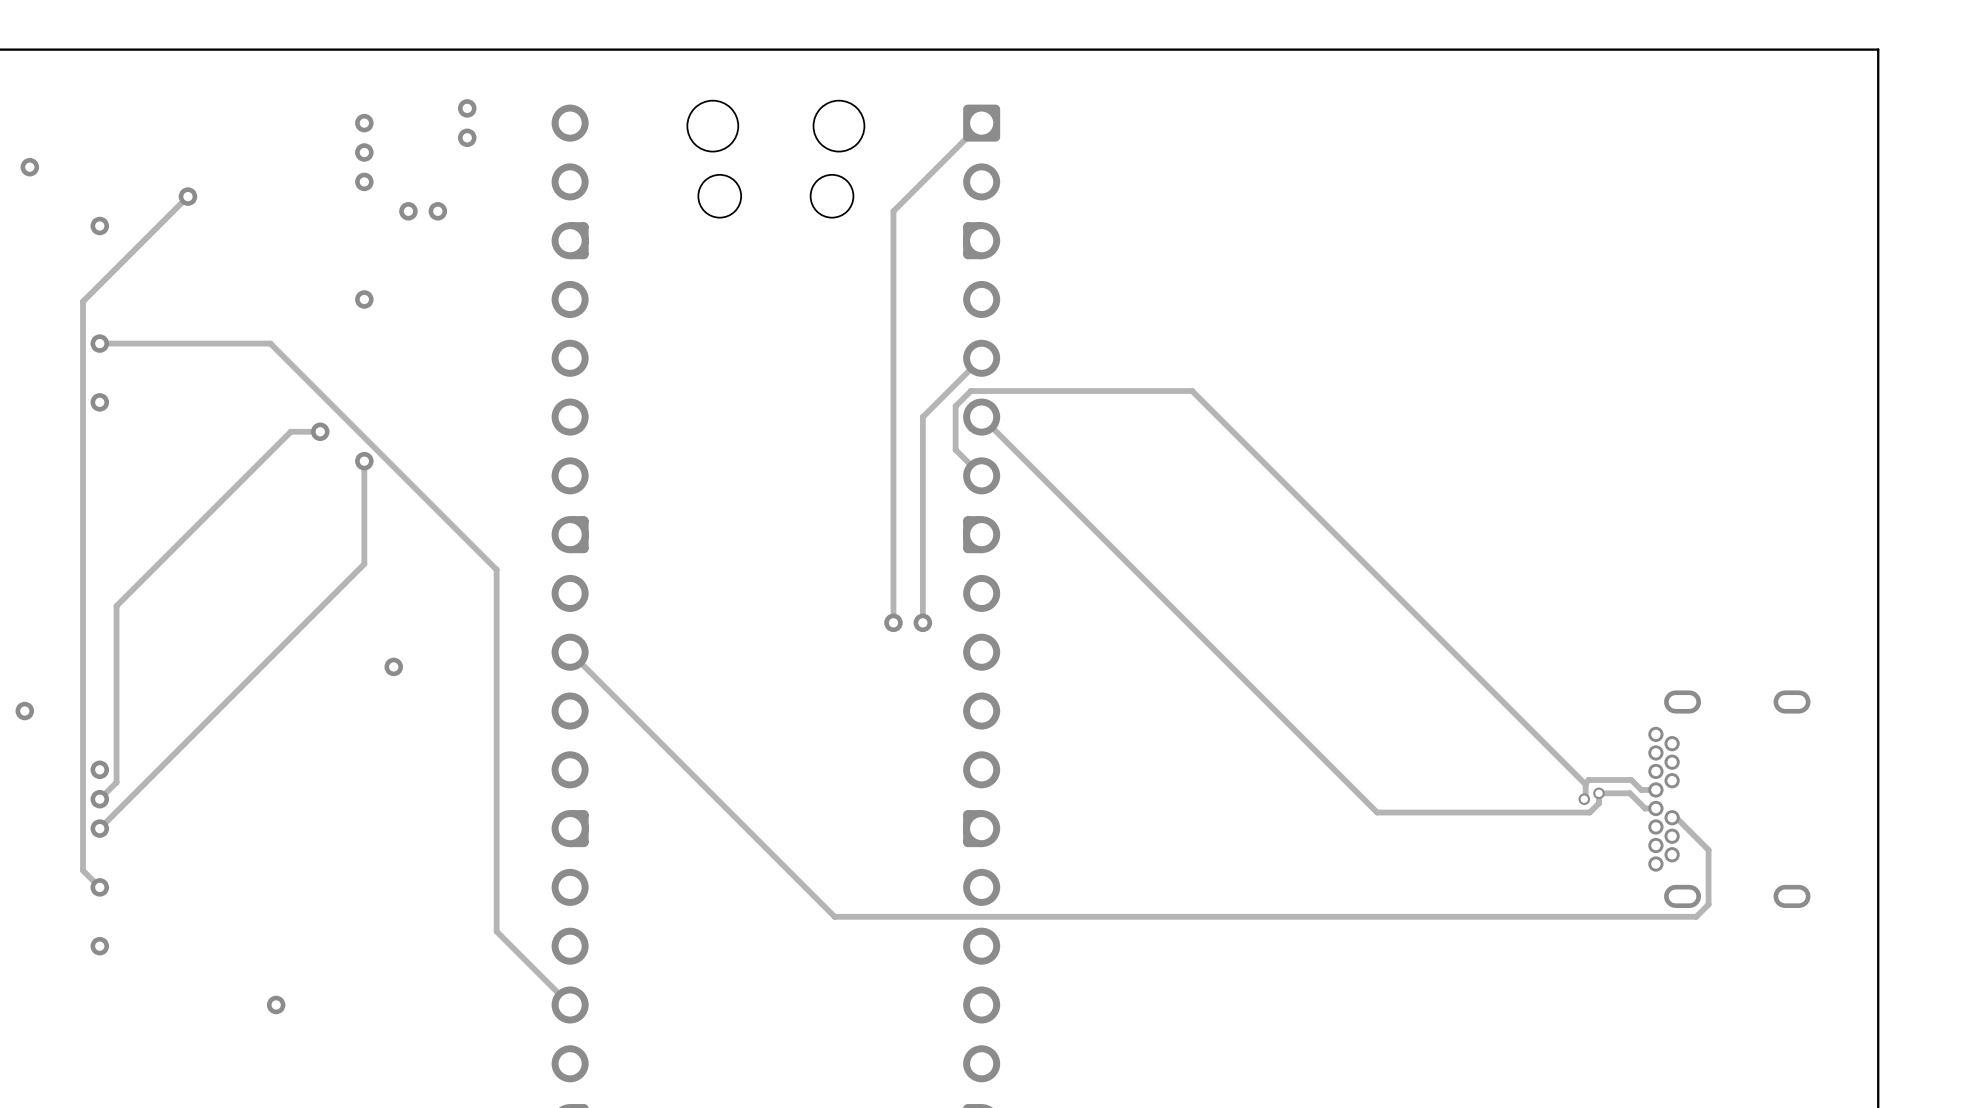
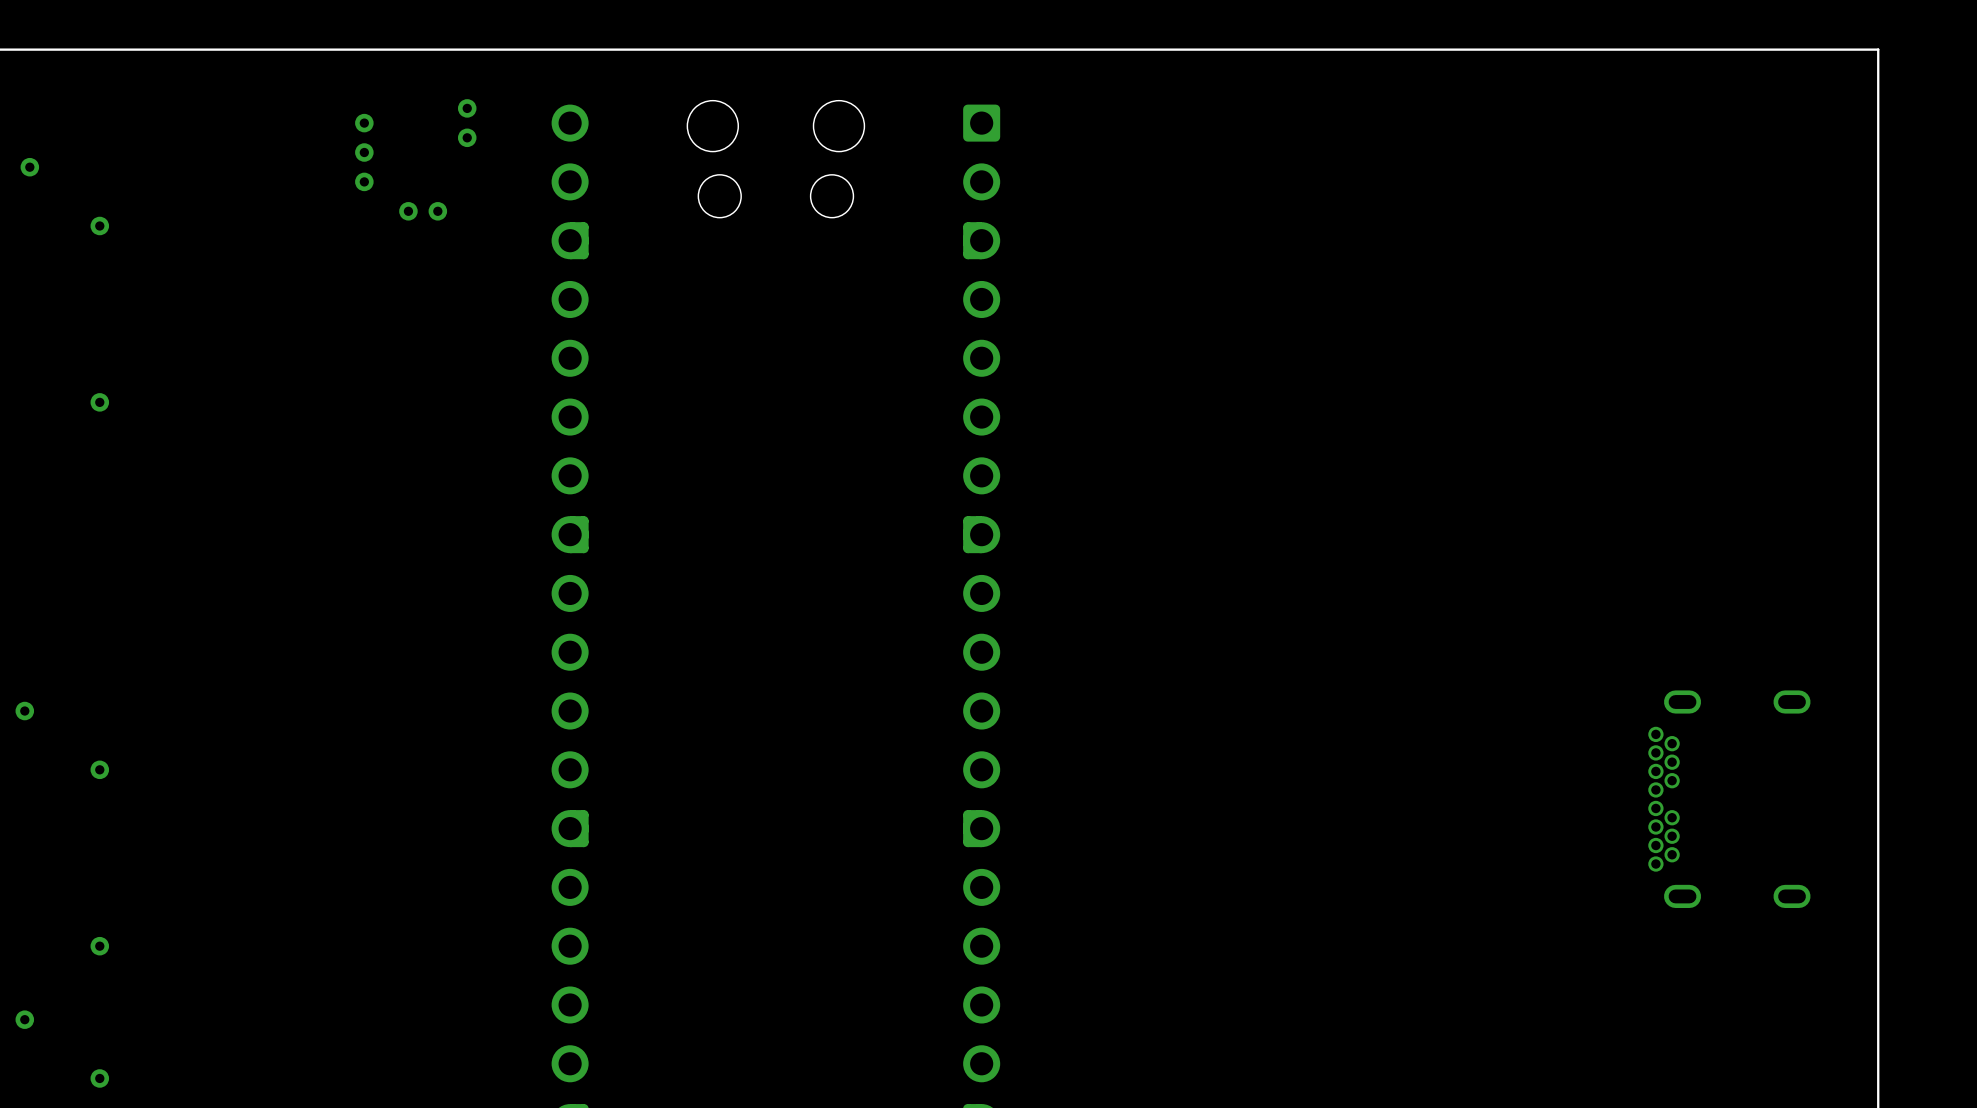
track: (981, 123) (893, 211) (893, 622) -> none
track: (187, 196) (83, 301) (83, 870) (99, 887) -> none
via: (187, 196) -> none
via: (364, 299) -> none
track: (99, 343) (270, 343) (496, 569) (496, 931) (570, 1004) -> none
via: (99, 343) -> none
track: (981, 358) (922, 417) (922, 622) -> none
track: (981, 417) (1377, 812) (1589, 812) (1598, 803) (1598, 793) (1629, 793) (1645, 808) (1655, 808) -> none
track: (320, 431) (290, 431) (116, 606) (116, 782) (99, 799) -> none
via: (320, 431) -> none
track: (364, 461) (364, 564) (99, 828) -> none
via: (364, 461) -> none
track: (981, 475) (955, 449) (955, 406) (970, 391) (1192, 391) (1585, 784) -> none
via: (893, 622) -> none
via: (922, 622) -> none
track: (570, 652) (834, 916) (1696, 916) (1708, 904) (1708, 850) (1676, 817) (1672, 817) -> none
via: (393, 666) -> none
track: (1655, 789) (1641, 789) (1631, 780) (1588, 780) (1585, 783) (1584, 799) -> none
via: (1598, 793) -> none
via: (99, 799) -> none
via: (1584, 799) -> none
via: (99, 828) -> none
via: (99, 887) -> none
via: (276, 1004) -> none
via: none -> (24, 1019)
via: none -> (99, 1078)

